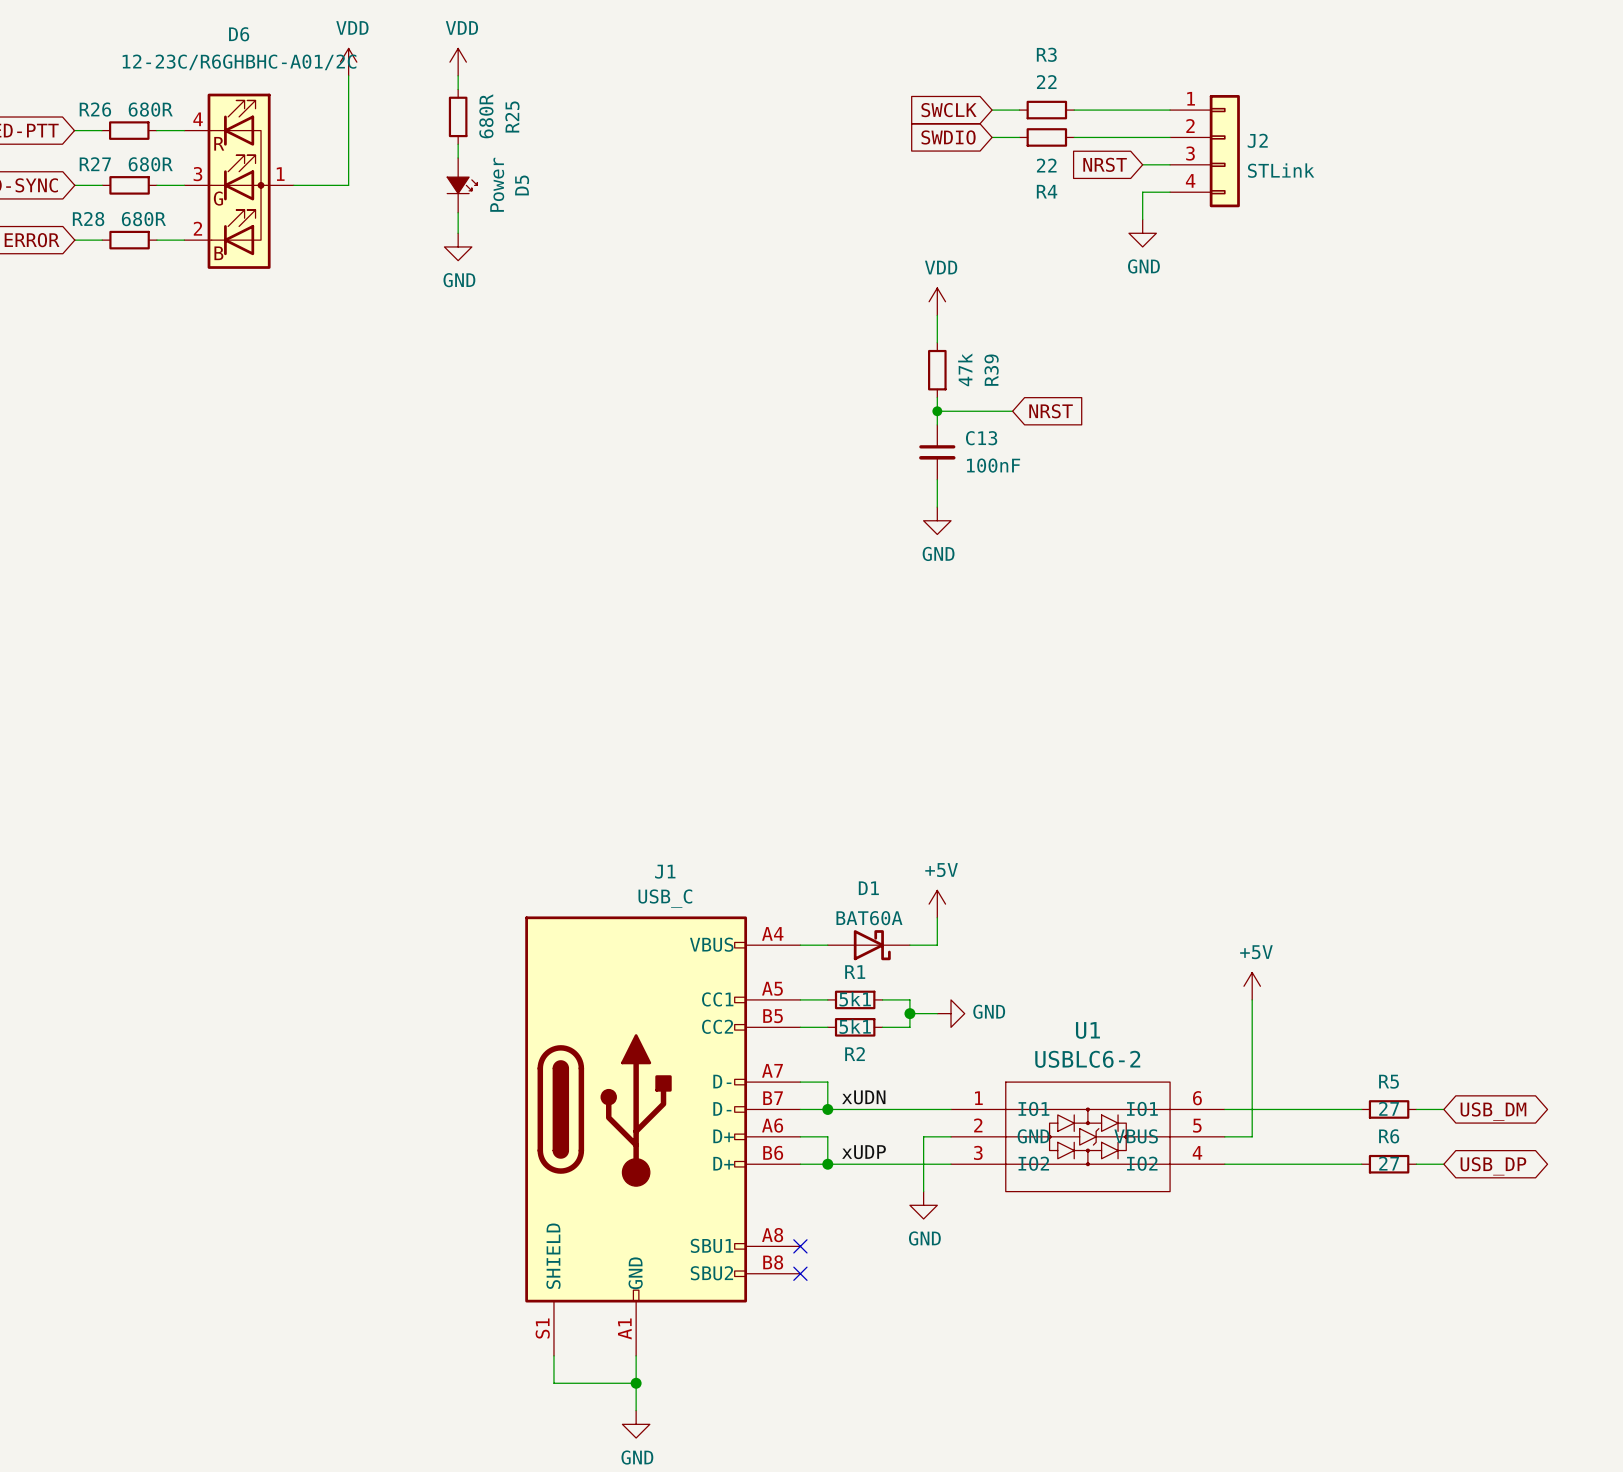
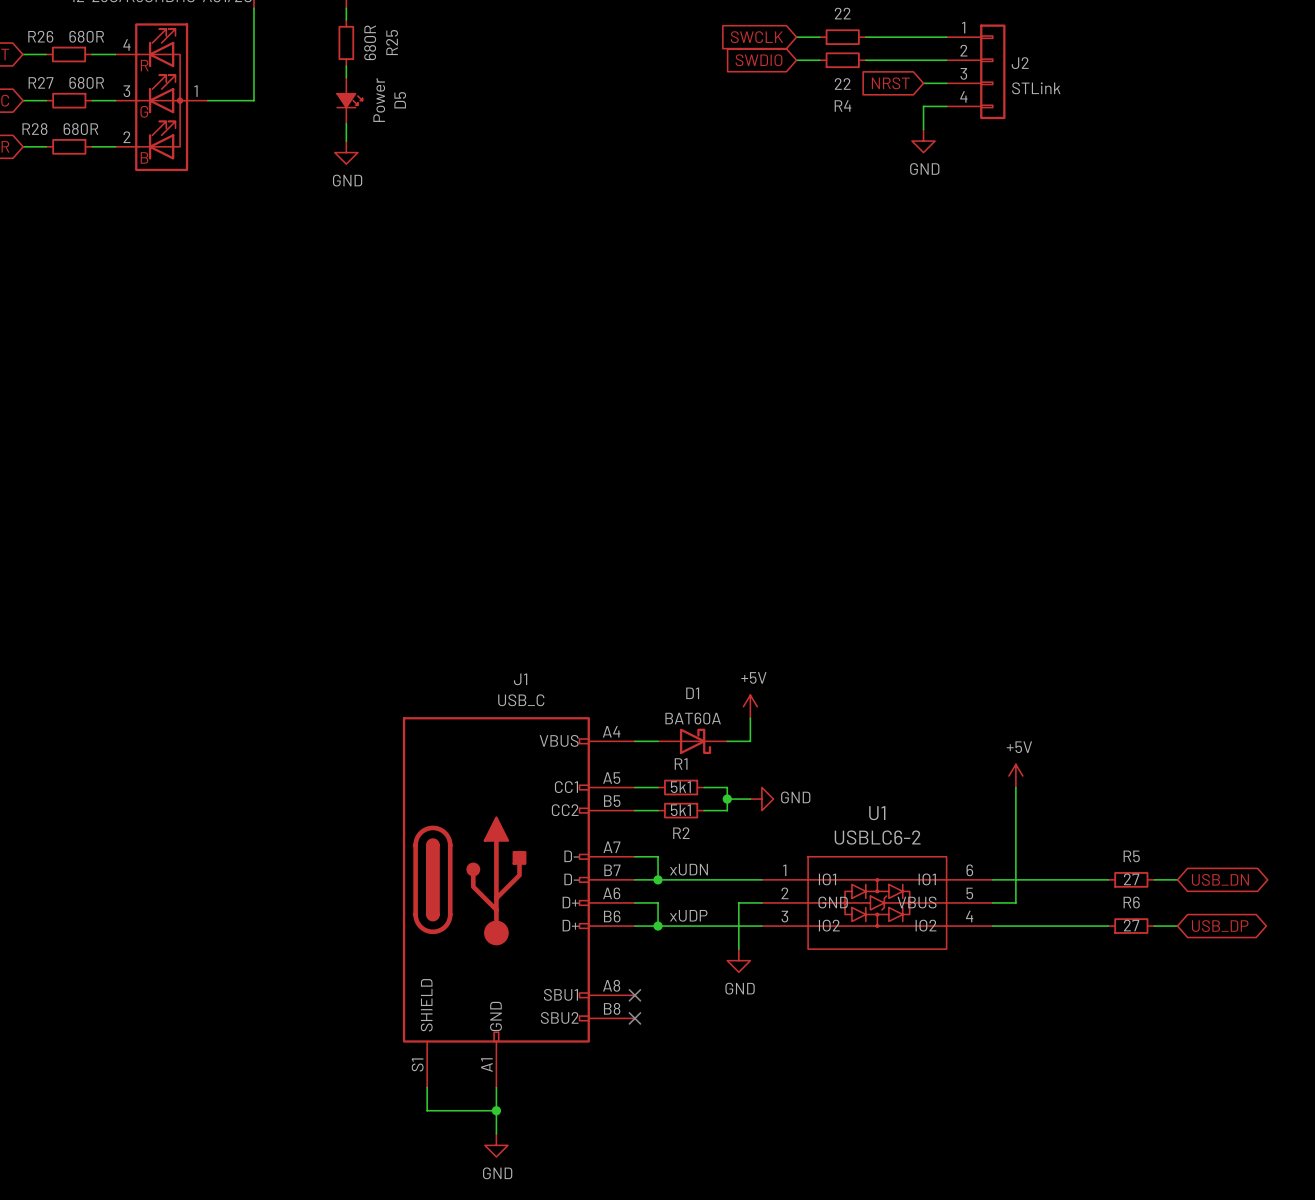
power symbol: VDD (937, 301) -> none
wire: (937, 315) (937, 342) -> none
R39: 47k (937, 370) -> none
wire: (937, 397) (937, 424) -> none
wire: (937, 411) (1012, 411) -> none
junction: (937, 411) -> none
global label: NRST (1051, 411) -> none
C13: 100nF (937, 452) -> none
wire: (937, 479) (937, 507) -> none
power symbol: GND (937, 520) -> none
global label: USB_DM (1493, 1111) -> USB_DN (1220, 879)

